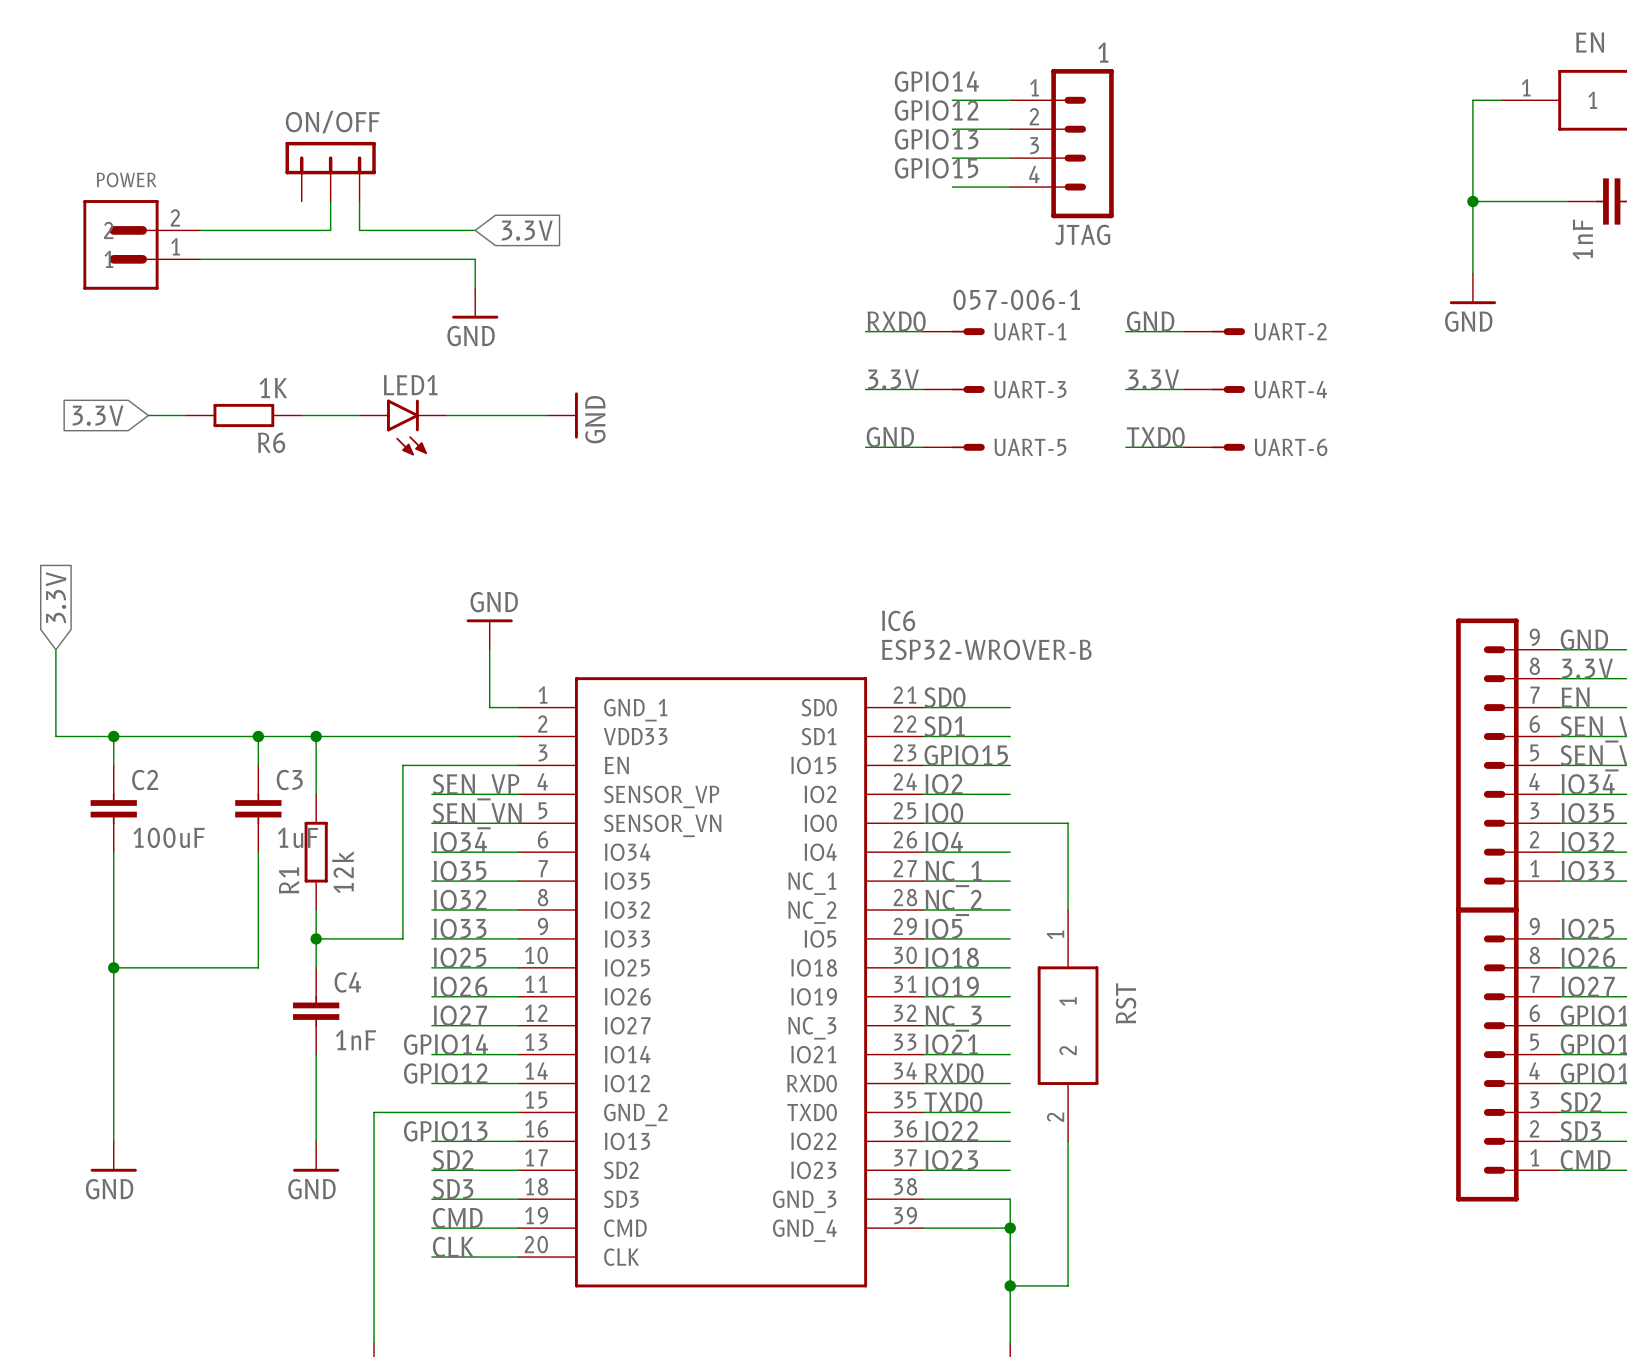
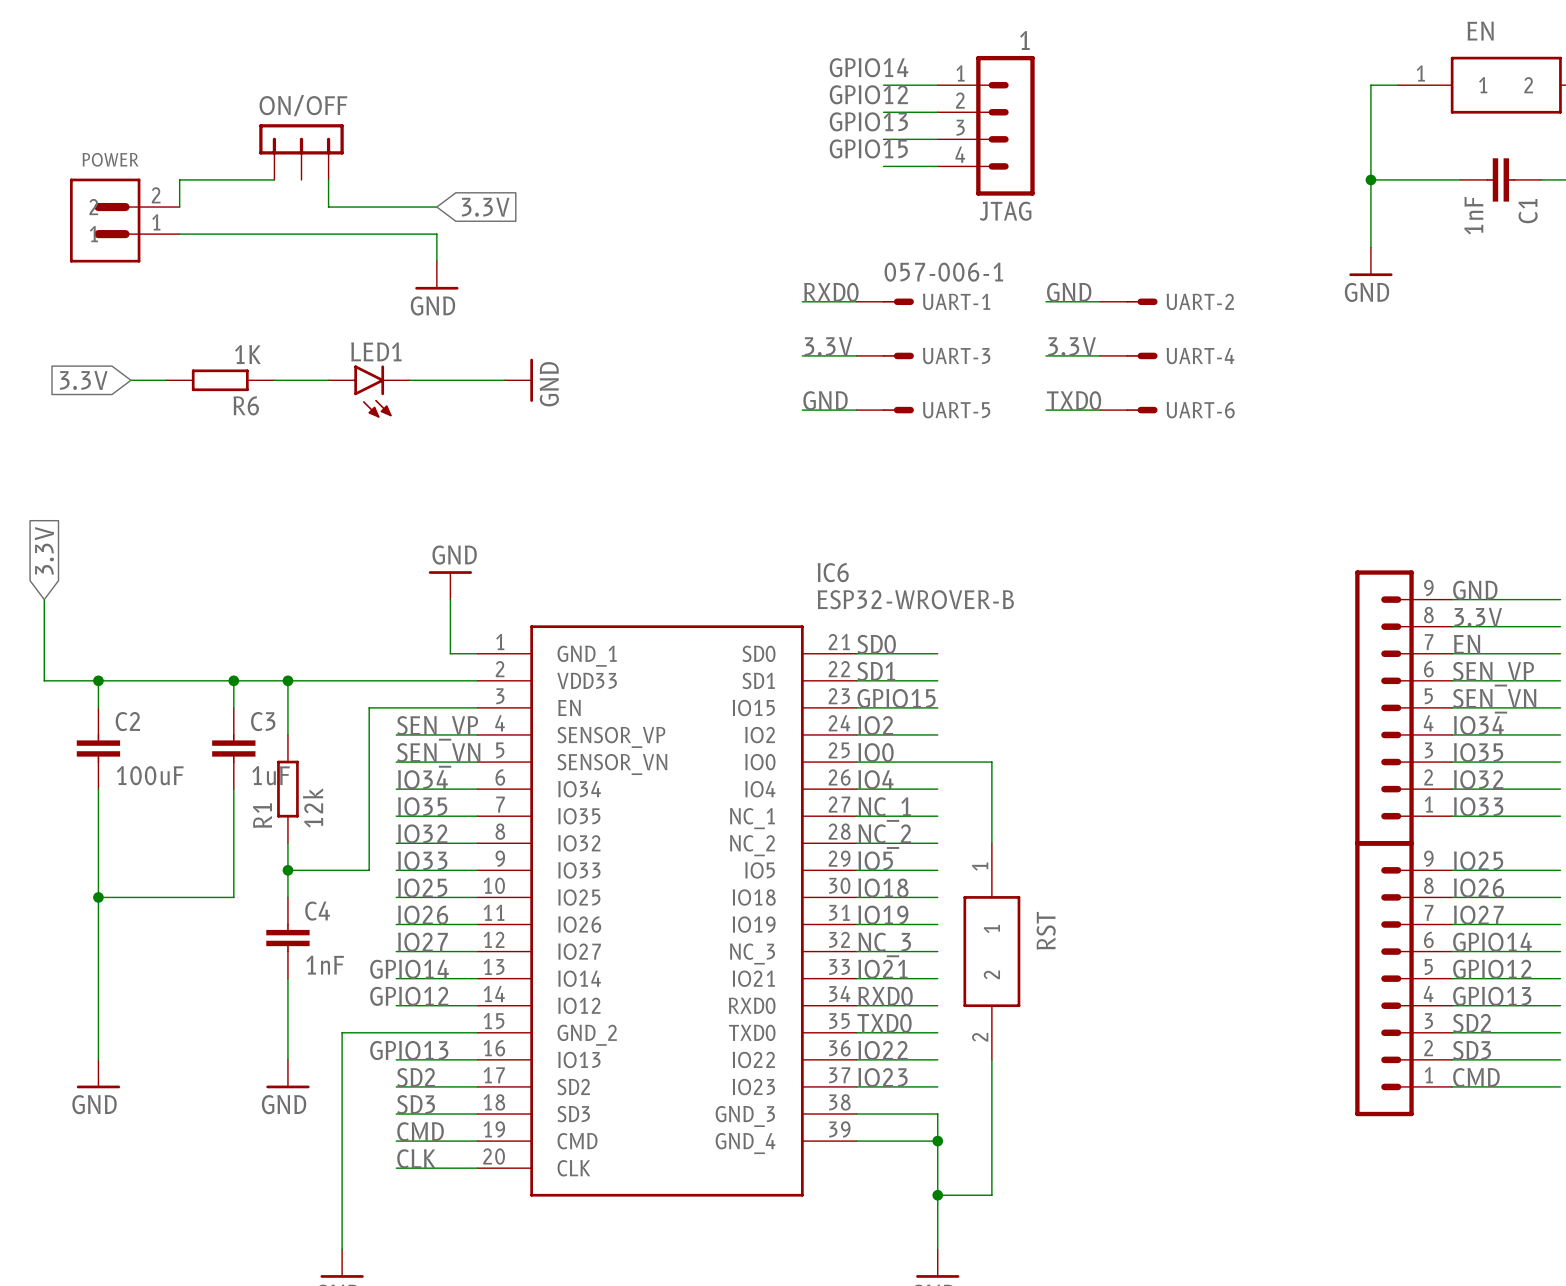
wire: (330, 201) (330, 230) (200, 230) -> (274, 179) (179, 179) (179, 207)

